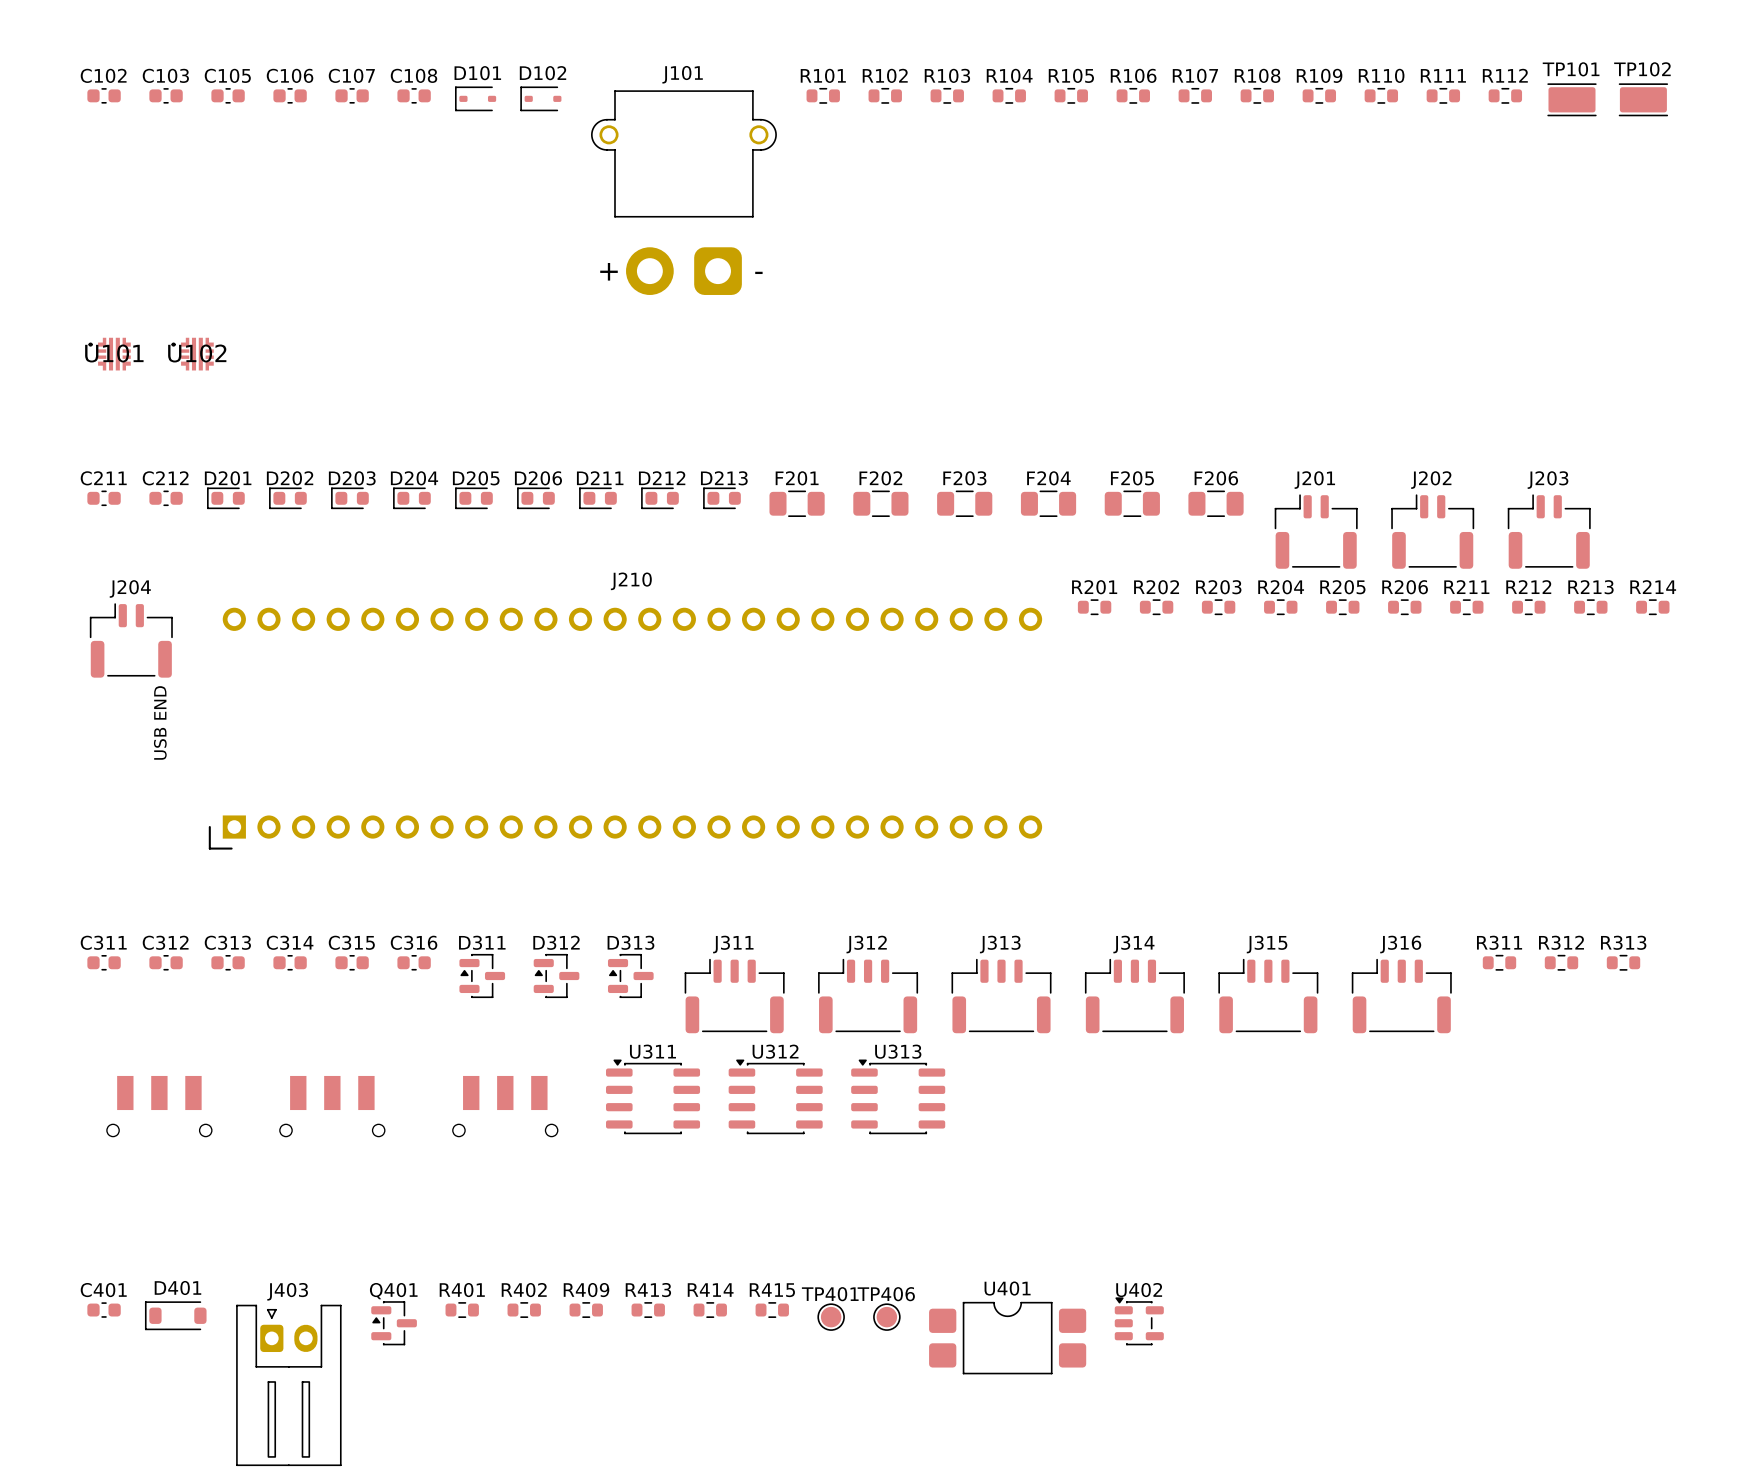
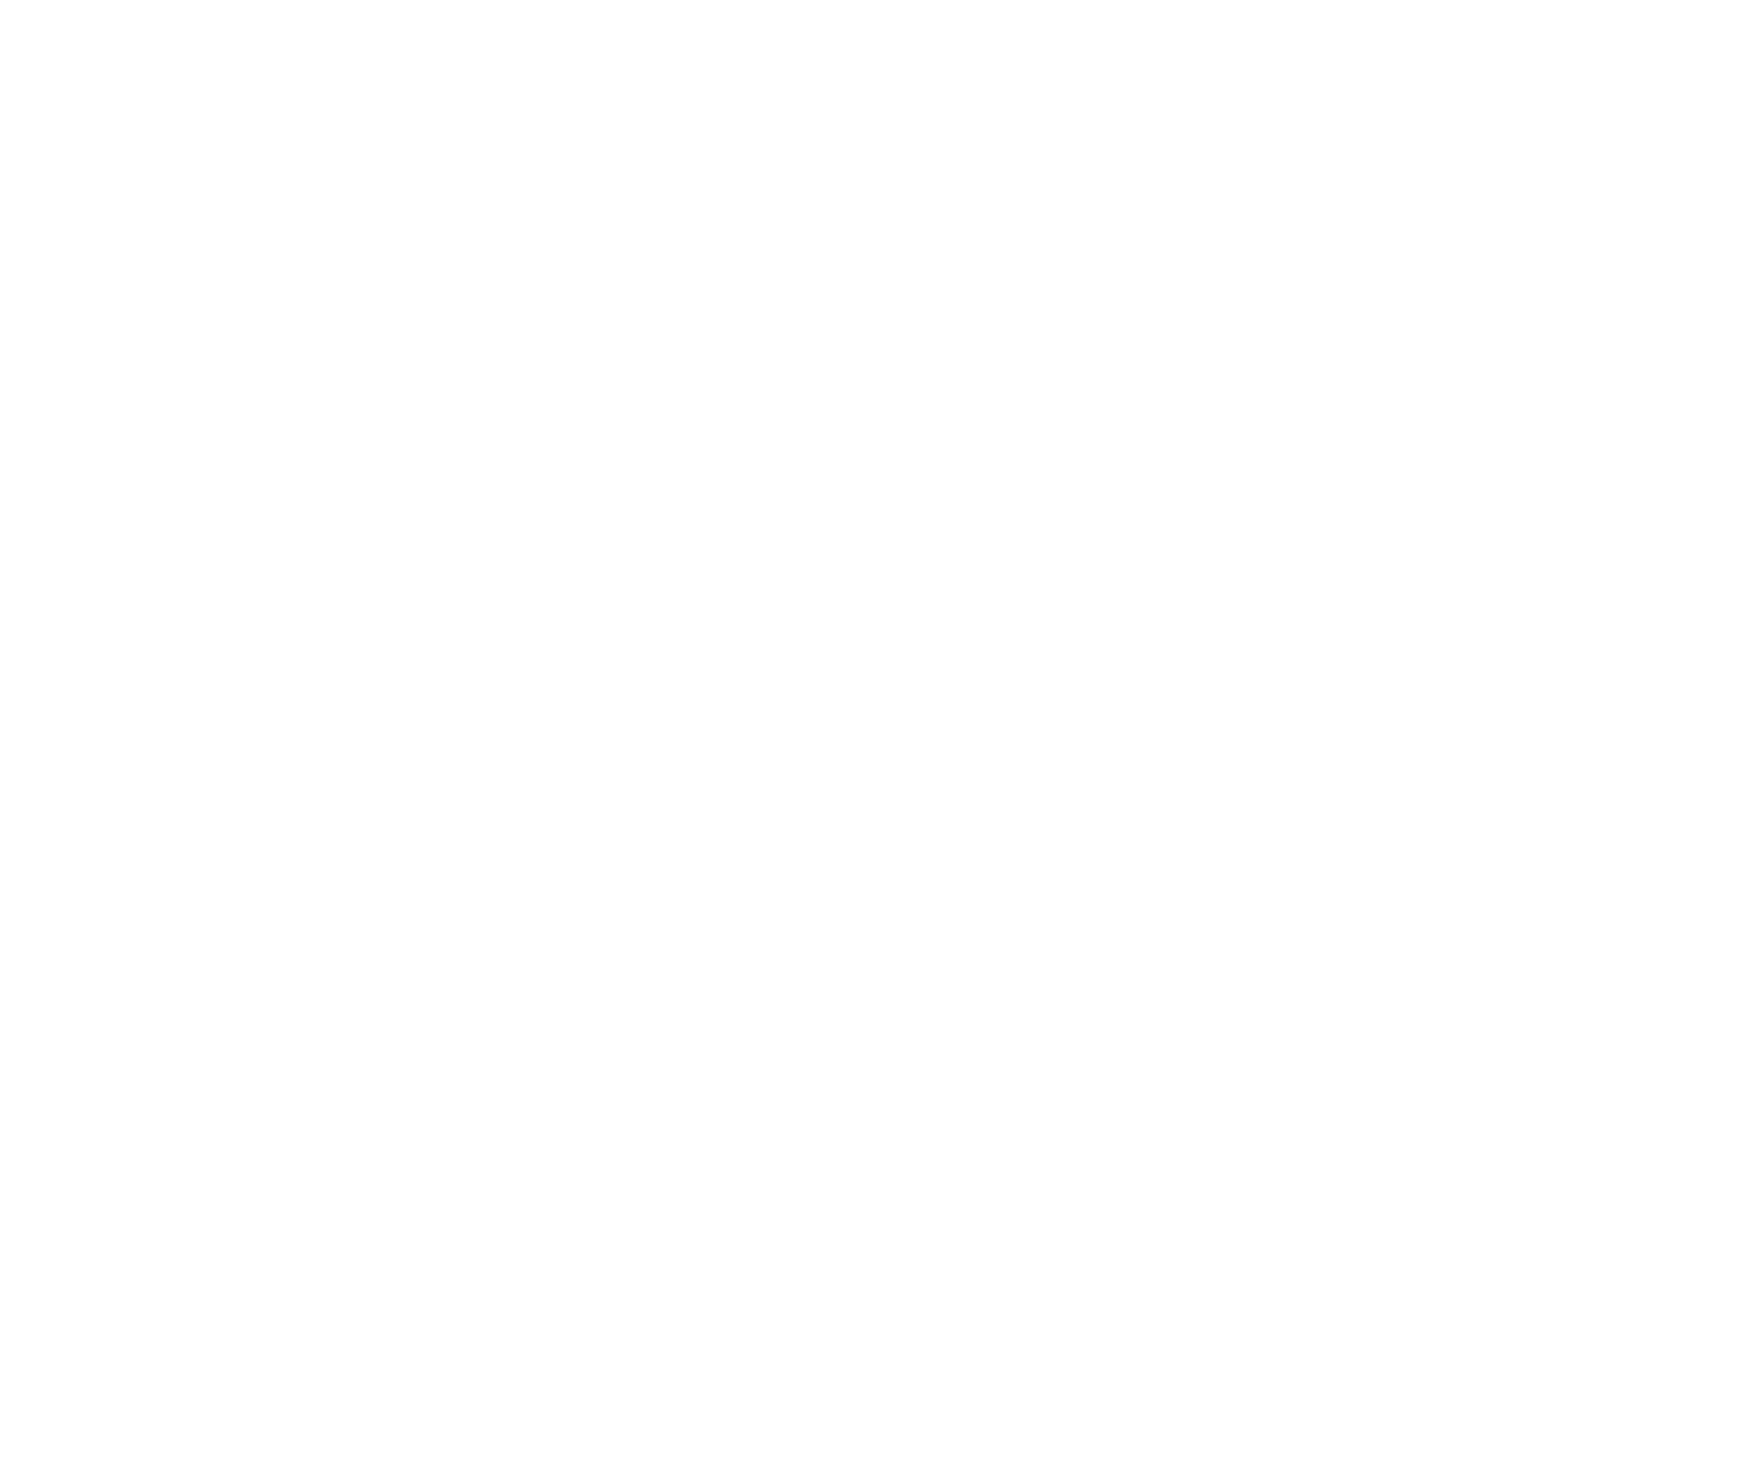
C102: (104, 95) -> none
C103: (166, 95) -> none
C105: (228, 95) -> none
C106: (290, 95) -> none
C107: (352, 95) -> none
C108: (414, 95) -> none
R101: (823, 95) -> none
R102: (885, 95) -> none
R103: (947, 95) -> none
R104: (1009, 95) -> none
R105: (1071, 95) -> none
R106: (1133, 95) -> none
R107: (1195, 95) -> none
R108: (1257, 95) -> none
R109: (1319, 95) -> none
R110: (1381, 95) -> none
R111: (1443, 95) -> none
R112: (1505, 95) -> none
D101: (475, 98) -> none
D102: (540, 98) -> none
TP101: (1571, 99) -> none
TP102: (1643, 99) -> none
J101: (683, 192) -> none
U101: (109, 354) -> none
U102: (192, 354) -> none
C211: (104, 498) -> none
C212: (166, 498) -> none
D201: (225, 498) -> none
D202: (287, 498) -> none
D203: (349, 498) -> none
D204: (411, 498) -> none
D205: (473, 498) -> none
D206: (535, 498) -> none
D211: (597, 498) -> none
D212: (659, 498) -> none
D213: (721, 498) -> none
F201: (797, 503) -> none
F202: (880, 503) -> none
F203: (964, 503) -> none
F204: (1048, 503) -> none
F205: (1132, 503) -> none
F206: (1216, 503) -> none
J201: (1316, 531) -> none
J202: (1432, 531) -> none
J203: (1549, 531) -> none
R201: (1094, 607) -> none
R202: (1156, 607) -> none
R203: (1218, 607) -> none
R204: (1280, 607) -> none
R205: (1342, 607) -> none
R206: (1404, 607) -> none
R211: (1466, 607) -> none
R212: (1528, 607) -> none
R213: (1590, 607) -> none
R214: (1652, 607) -> none
J204: (131, 640) -> none
J210: (625, 728) -> none
C311: (104, 962) -> none
C312: (166, 962) -> none
C313: (228, 962) -> none
C314: (290, 962) -> none
C315: (352, 962) -> none
C316: (414, 962) -> none
R311: (1499, 962) -> none
R312: (1561, 962) -> none
R313: (1623, 962) -> none
D311: (482, 975) -> none
D312: (556, 975) -> none
D313: (630, 975) -> none
J311: (734, 996) -> none
J312: (868, 996) -> none
J313: (1001, 996) -> none
J314: (1134, 996) -> none
J315: (1268, 996) -> none
J316: (1401, 996) -> none
U311: (653, 1096) -> none
U312: (775, 1096) -> none
U313: (898, 1096) -> none
part: (159, 1106) -> none
part: (332, 1106) -> none
part: (505, 1106) -> none
C401: (104, 1310) -> none
R401: (462, 1310) -> none
R402: (524, 1310) -> none
R409: (586, 1310) -> none
R413: (648, 1310) -> none
R414: (710, 1310) -> none
R415: (772, 1310) -> none
D401: (175, 1315) -> none
TP401: (831, 1317) -> none
TP406: (886, 1317) -> none
U402: (1139, 1321) -> none
Q401: (394, 1323) -> none
U401: (1007, 1338) -> none
J403: (288, 1385) -> none

